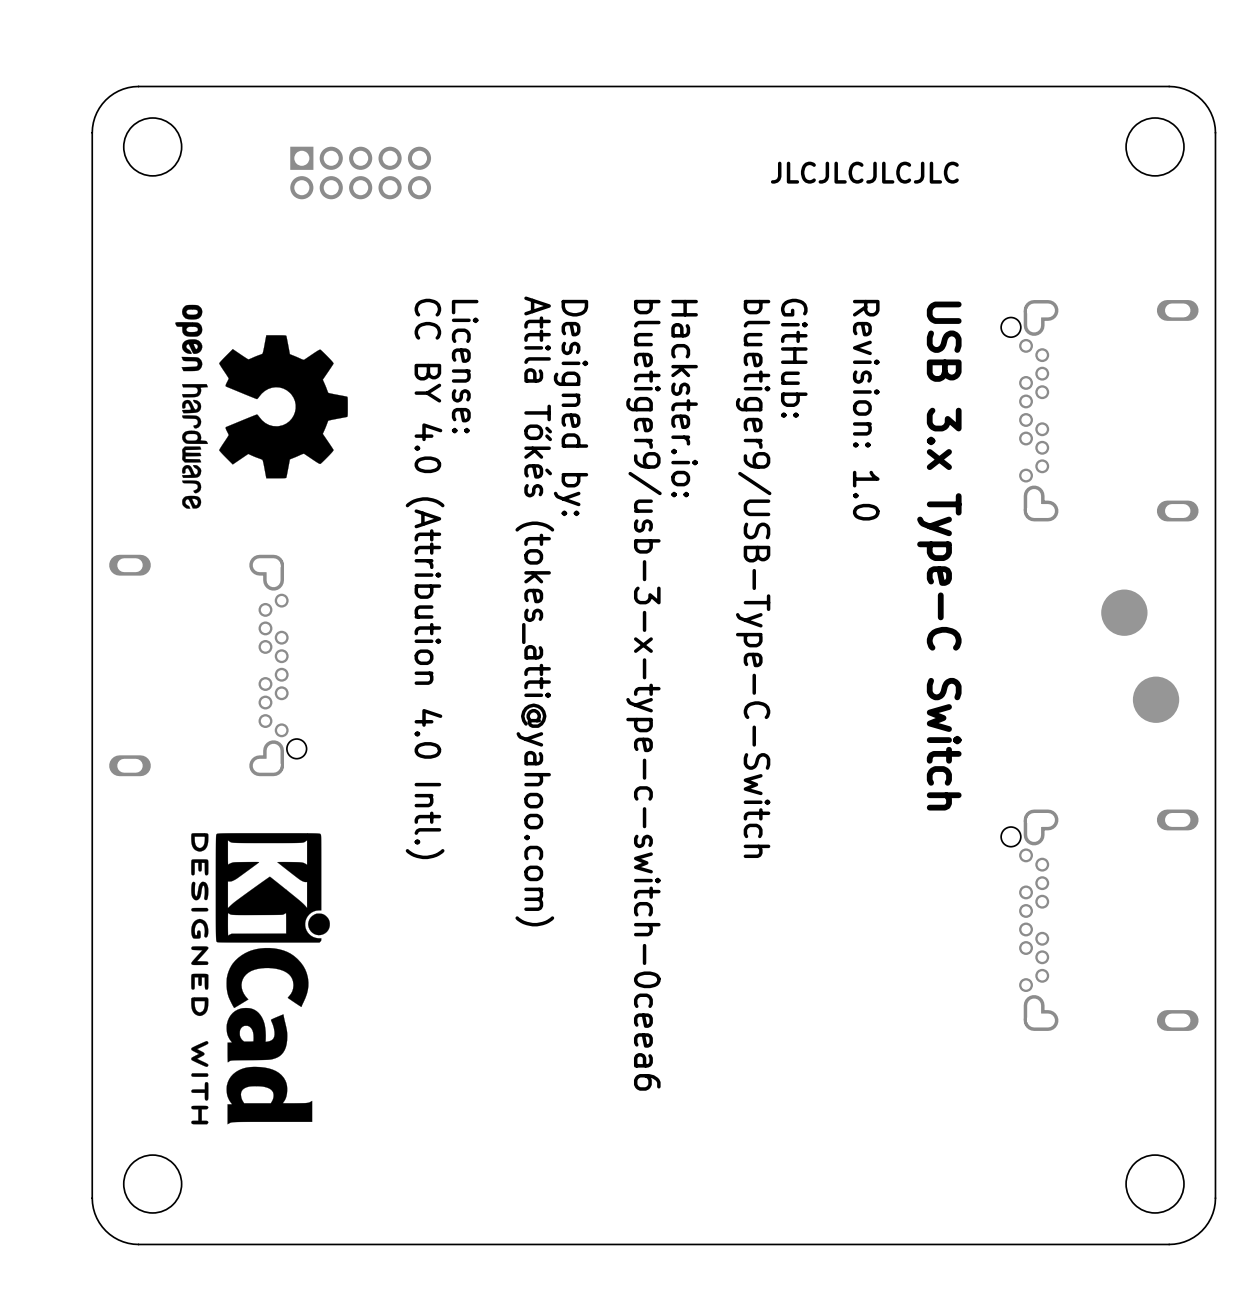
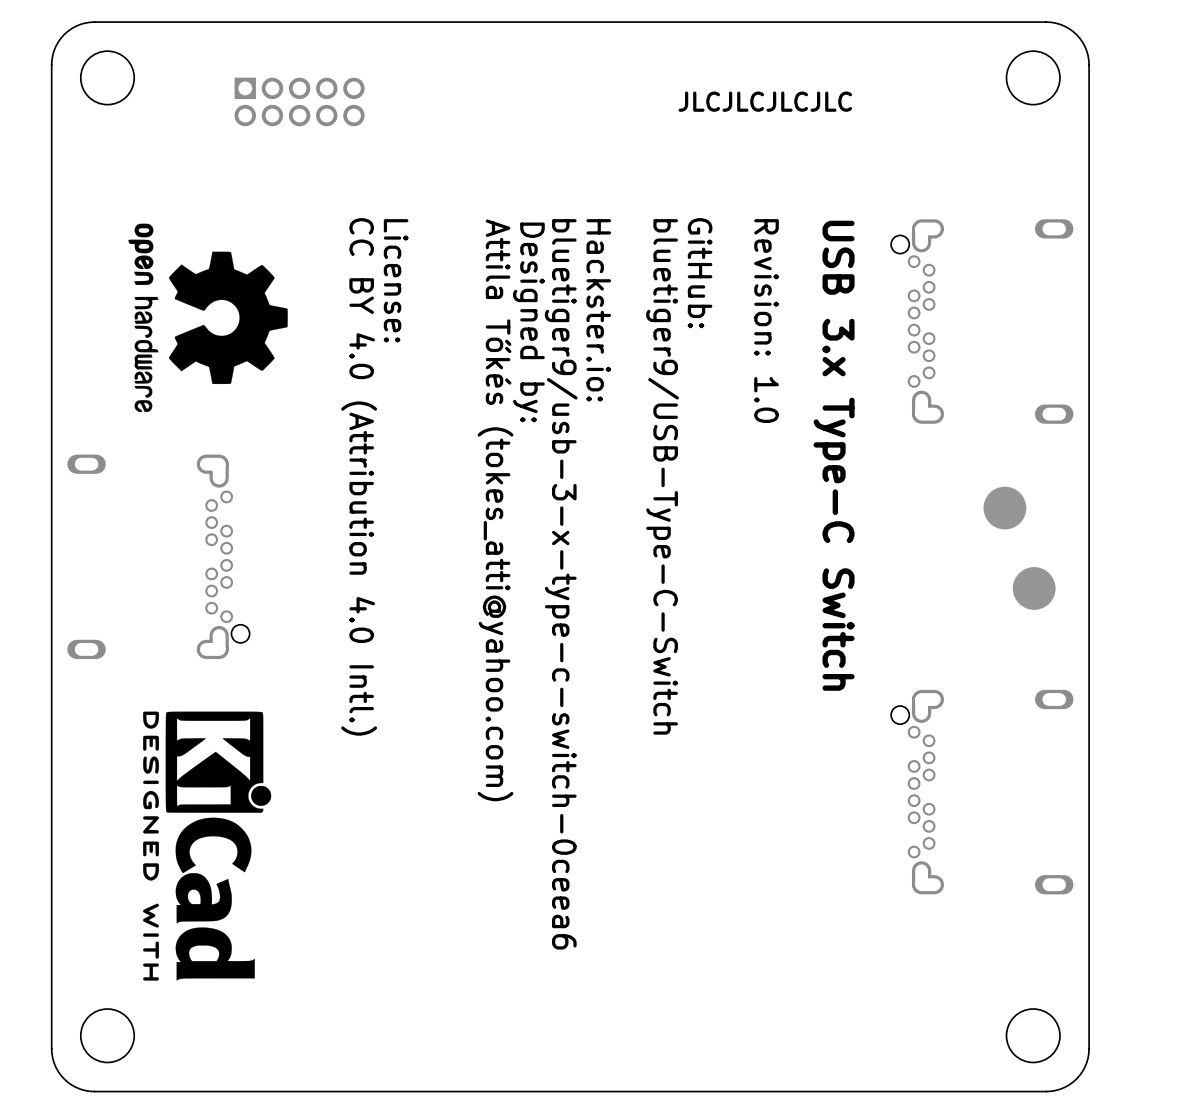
text: Designed by: (571, 407) -> Attila Tőkés (tokes_atti@yahoo.com) (495, 510)
text: none -> Designed by: (528, 322)
text: Attila Tőkés (tokes_atti@yahoo.com) (534, 611) -> none

